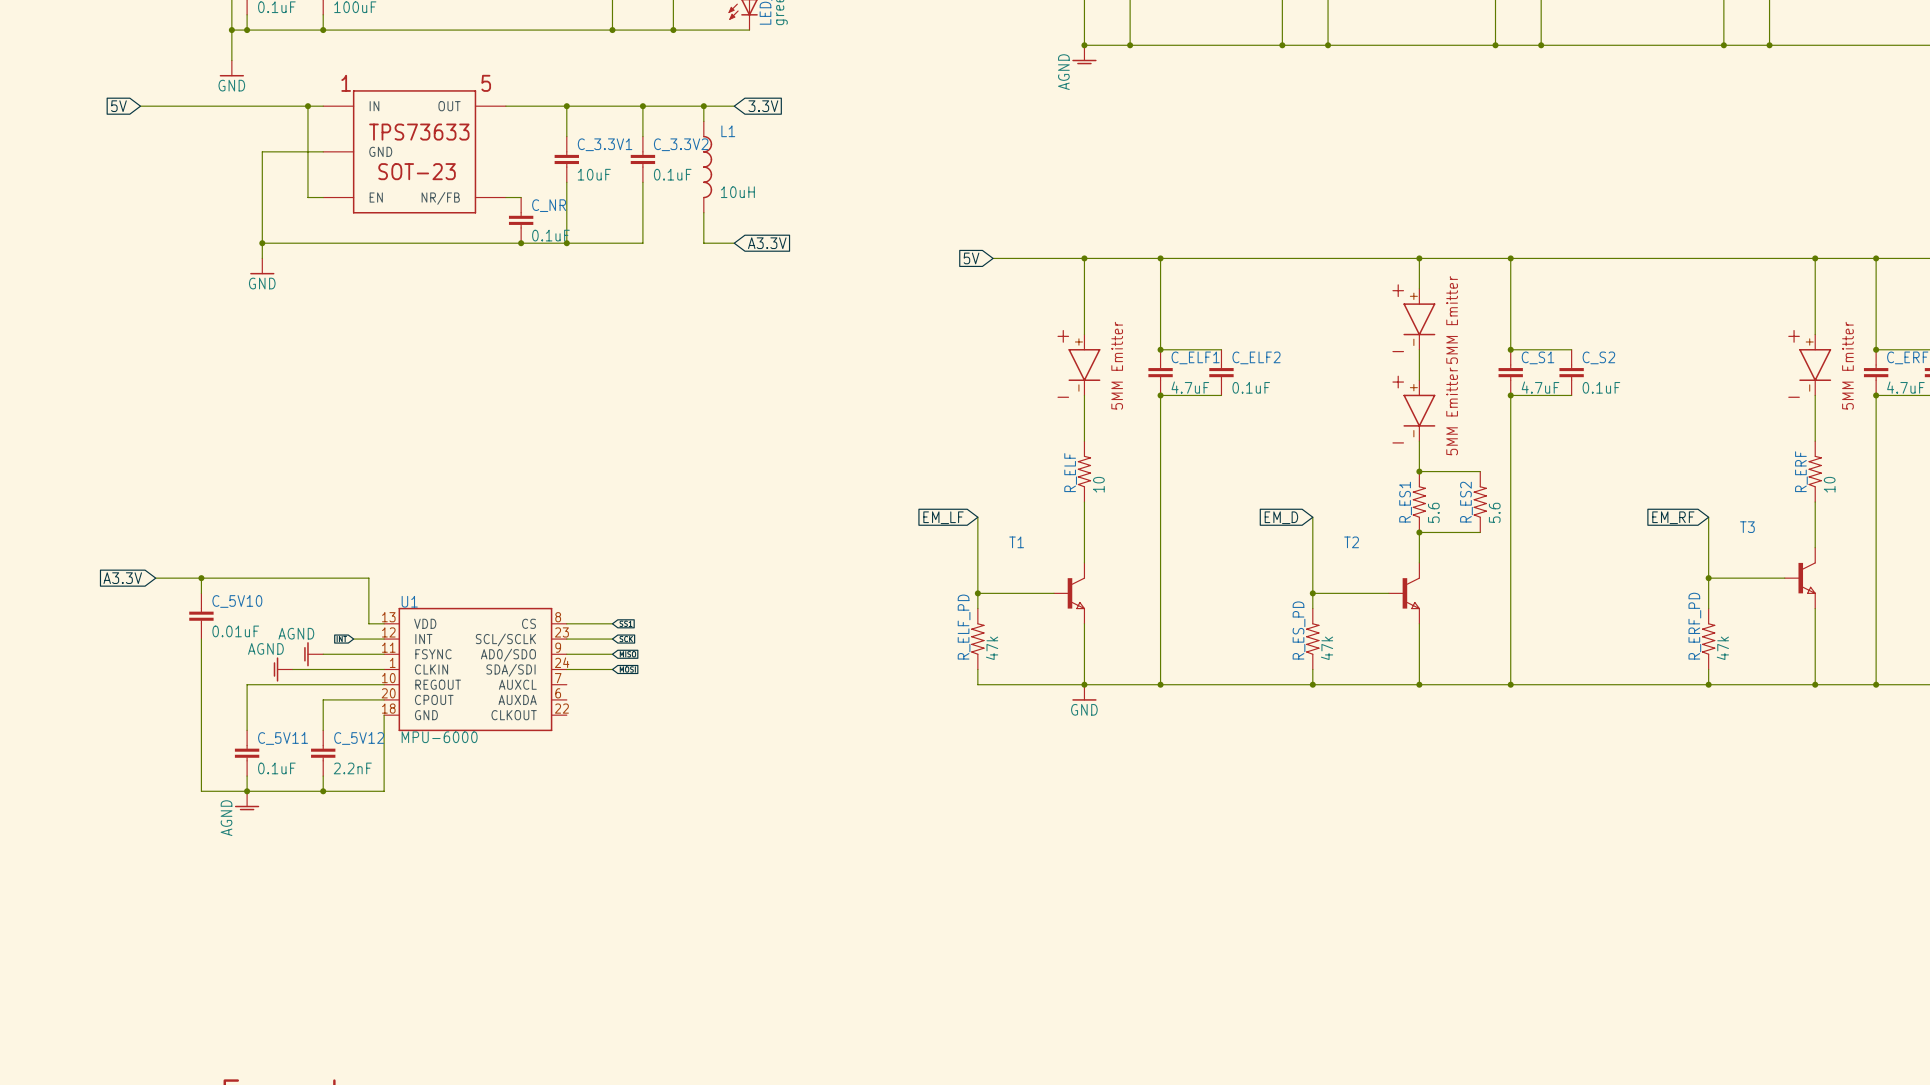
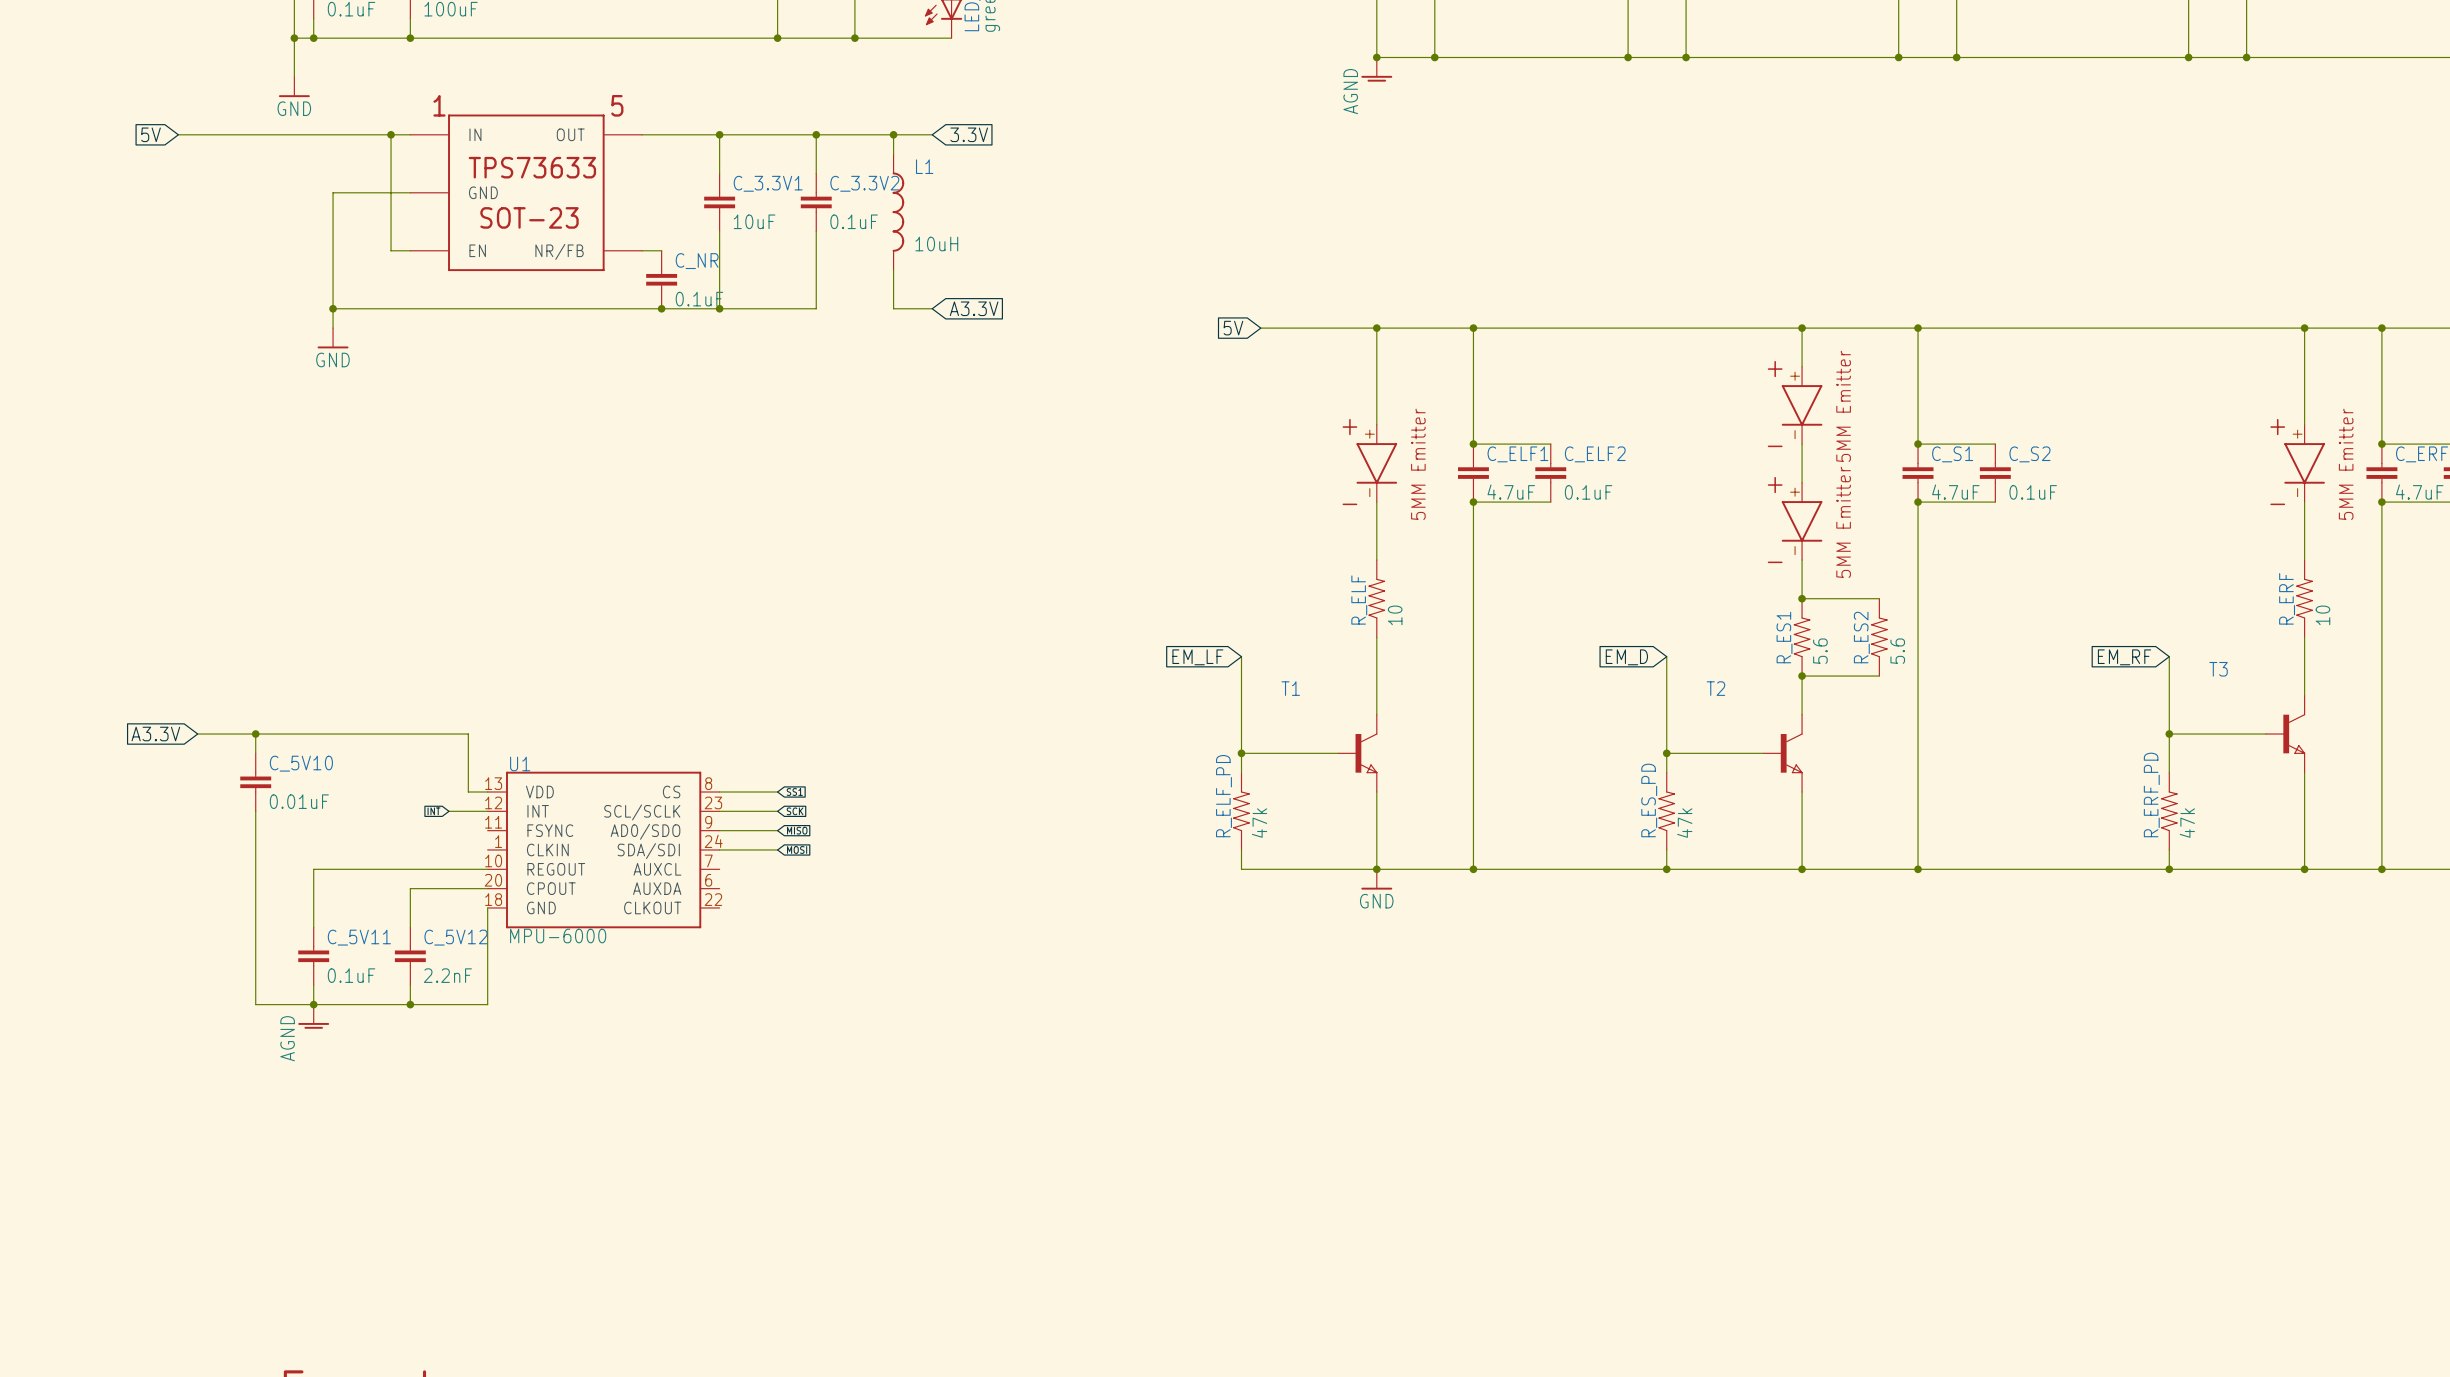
power symbol: AGND (313, 654) -> none
wire: (323, 654) (384, 654) -> none
power symbol: AGND (283, 669) -> none
wire: (292, 669) (384, 669) -> none

